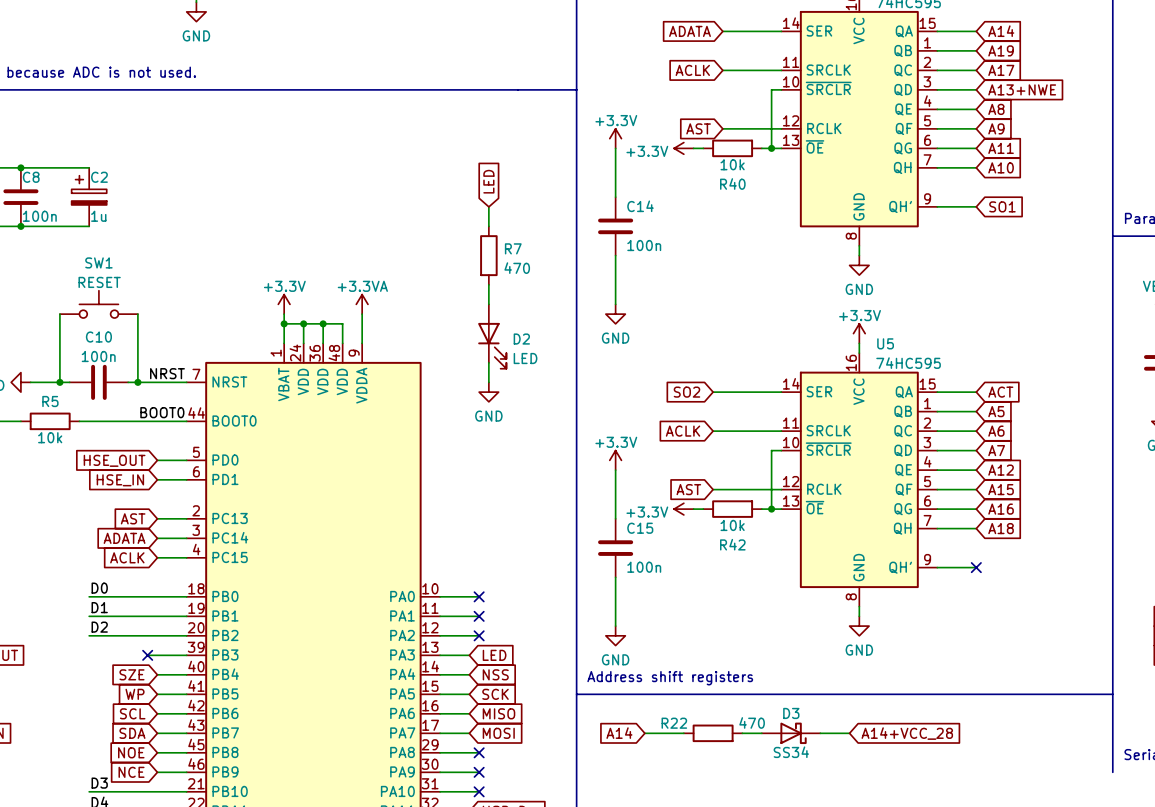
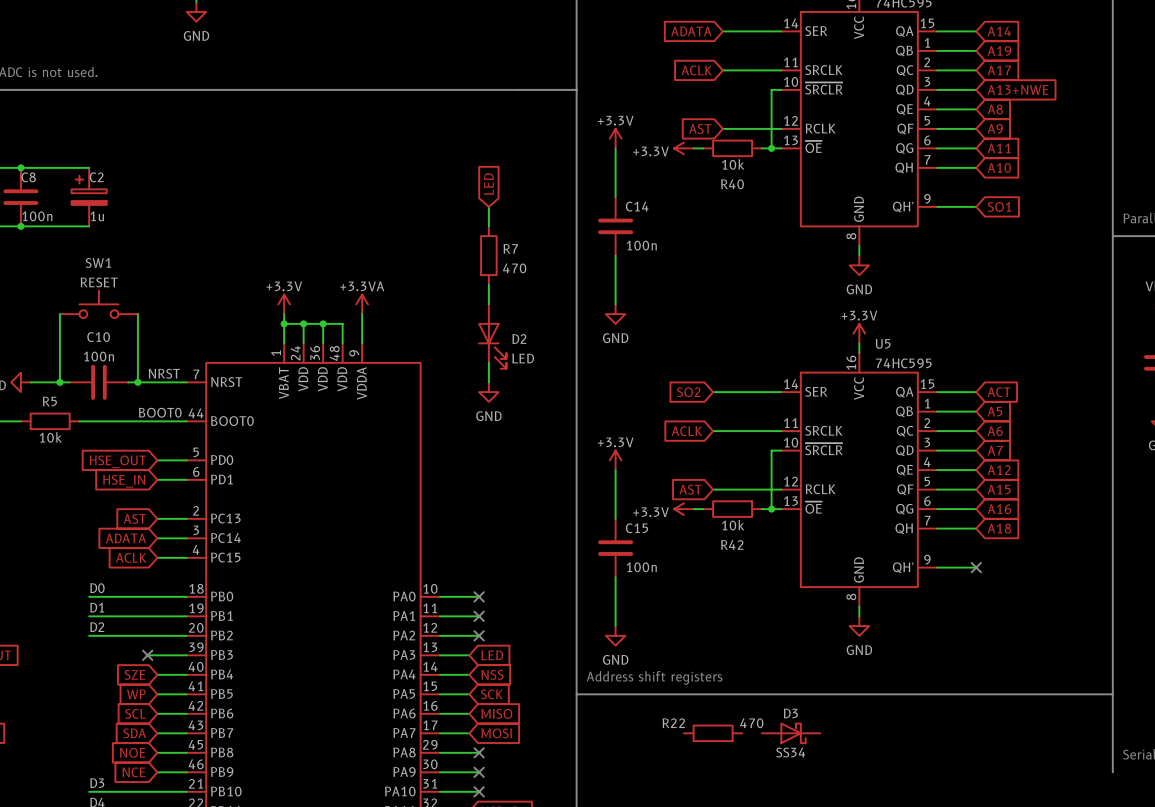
global label: A14 (619, 733) -> none
wire: (644, 733) (683, 733) -> none
wire: (742, 733) (761, 733) -> none
wire: (820, 733) (849, 733) -> none
global label: A14+VCC_28 (907, 733) -> none

